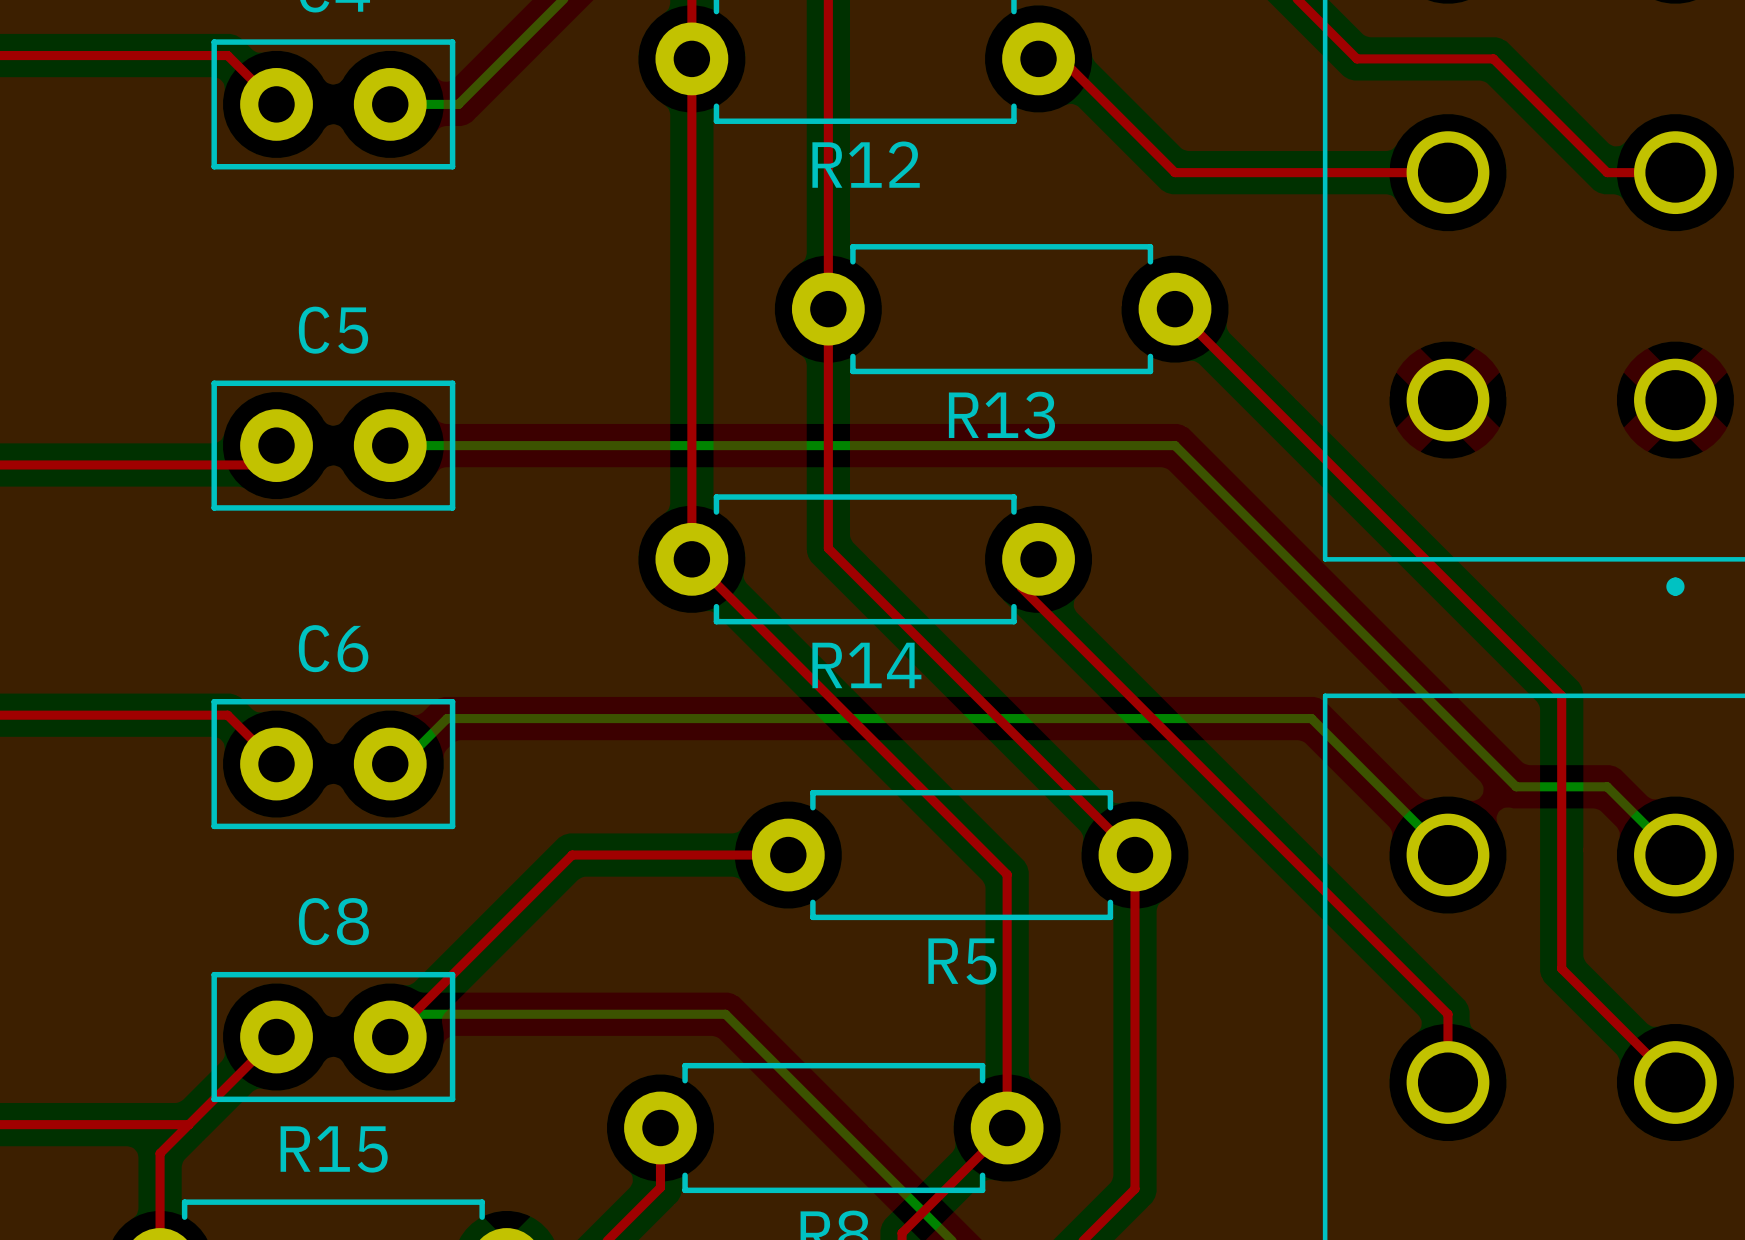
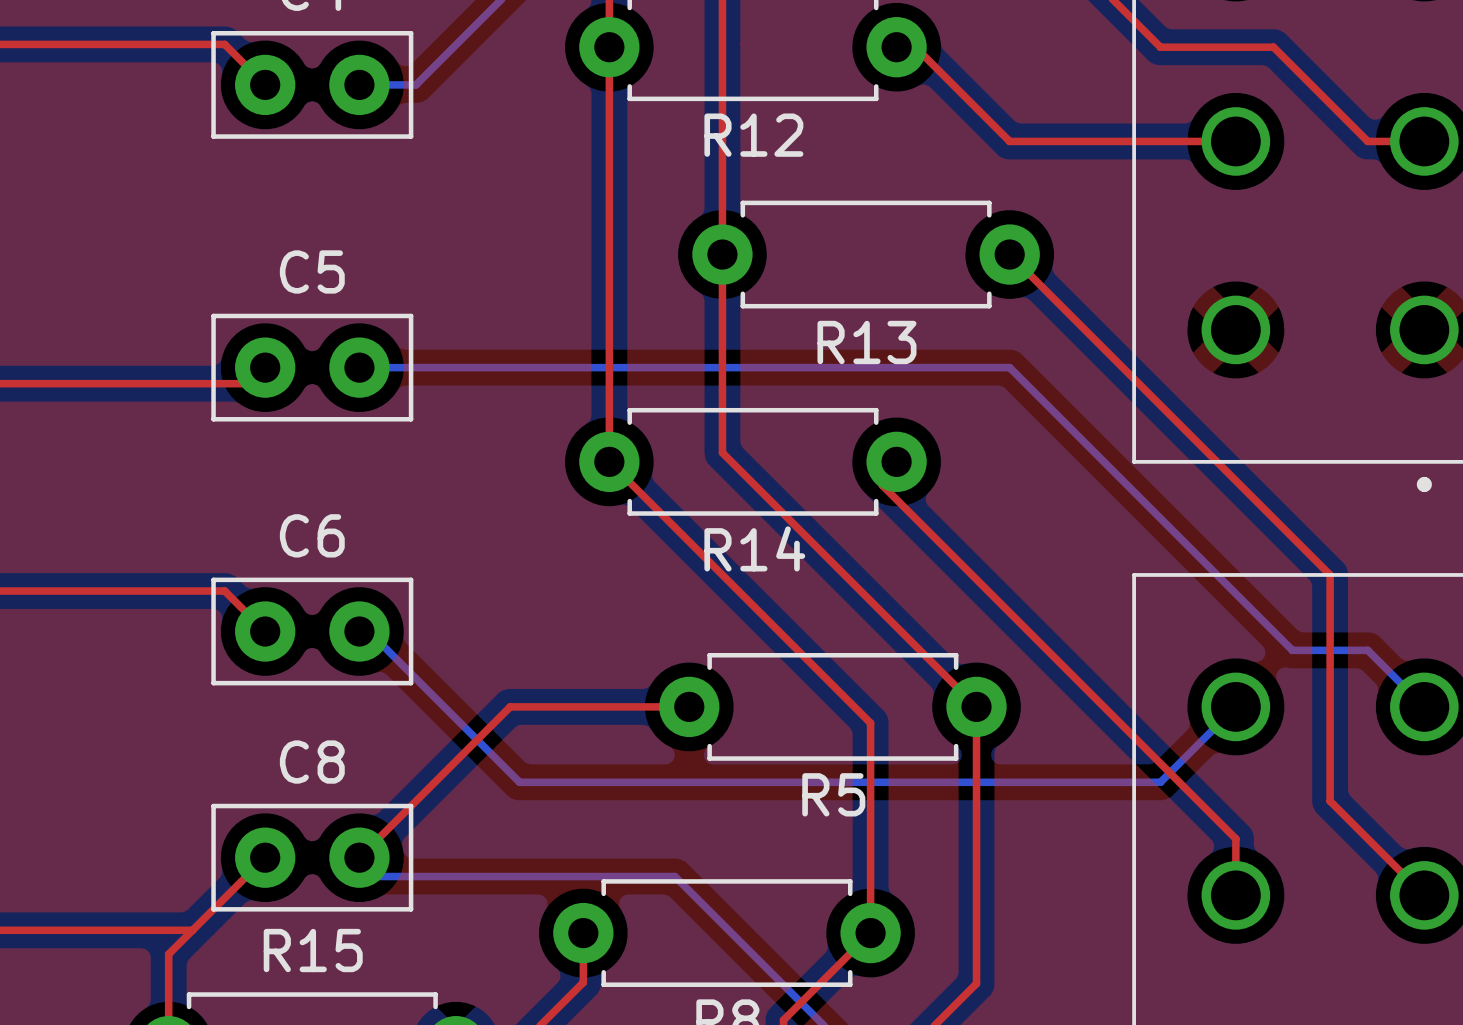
bottom track: (401, 764) (447, 718) (1311, 718) (1447, 855) -> (368, 631) (519, 782) (1160, 782) (1235, 706)
bottom track: (390, 1037) (413, 1014) (725, 1014) (771, 1059) -> (368, 876) (674, 876)

